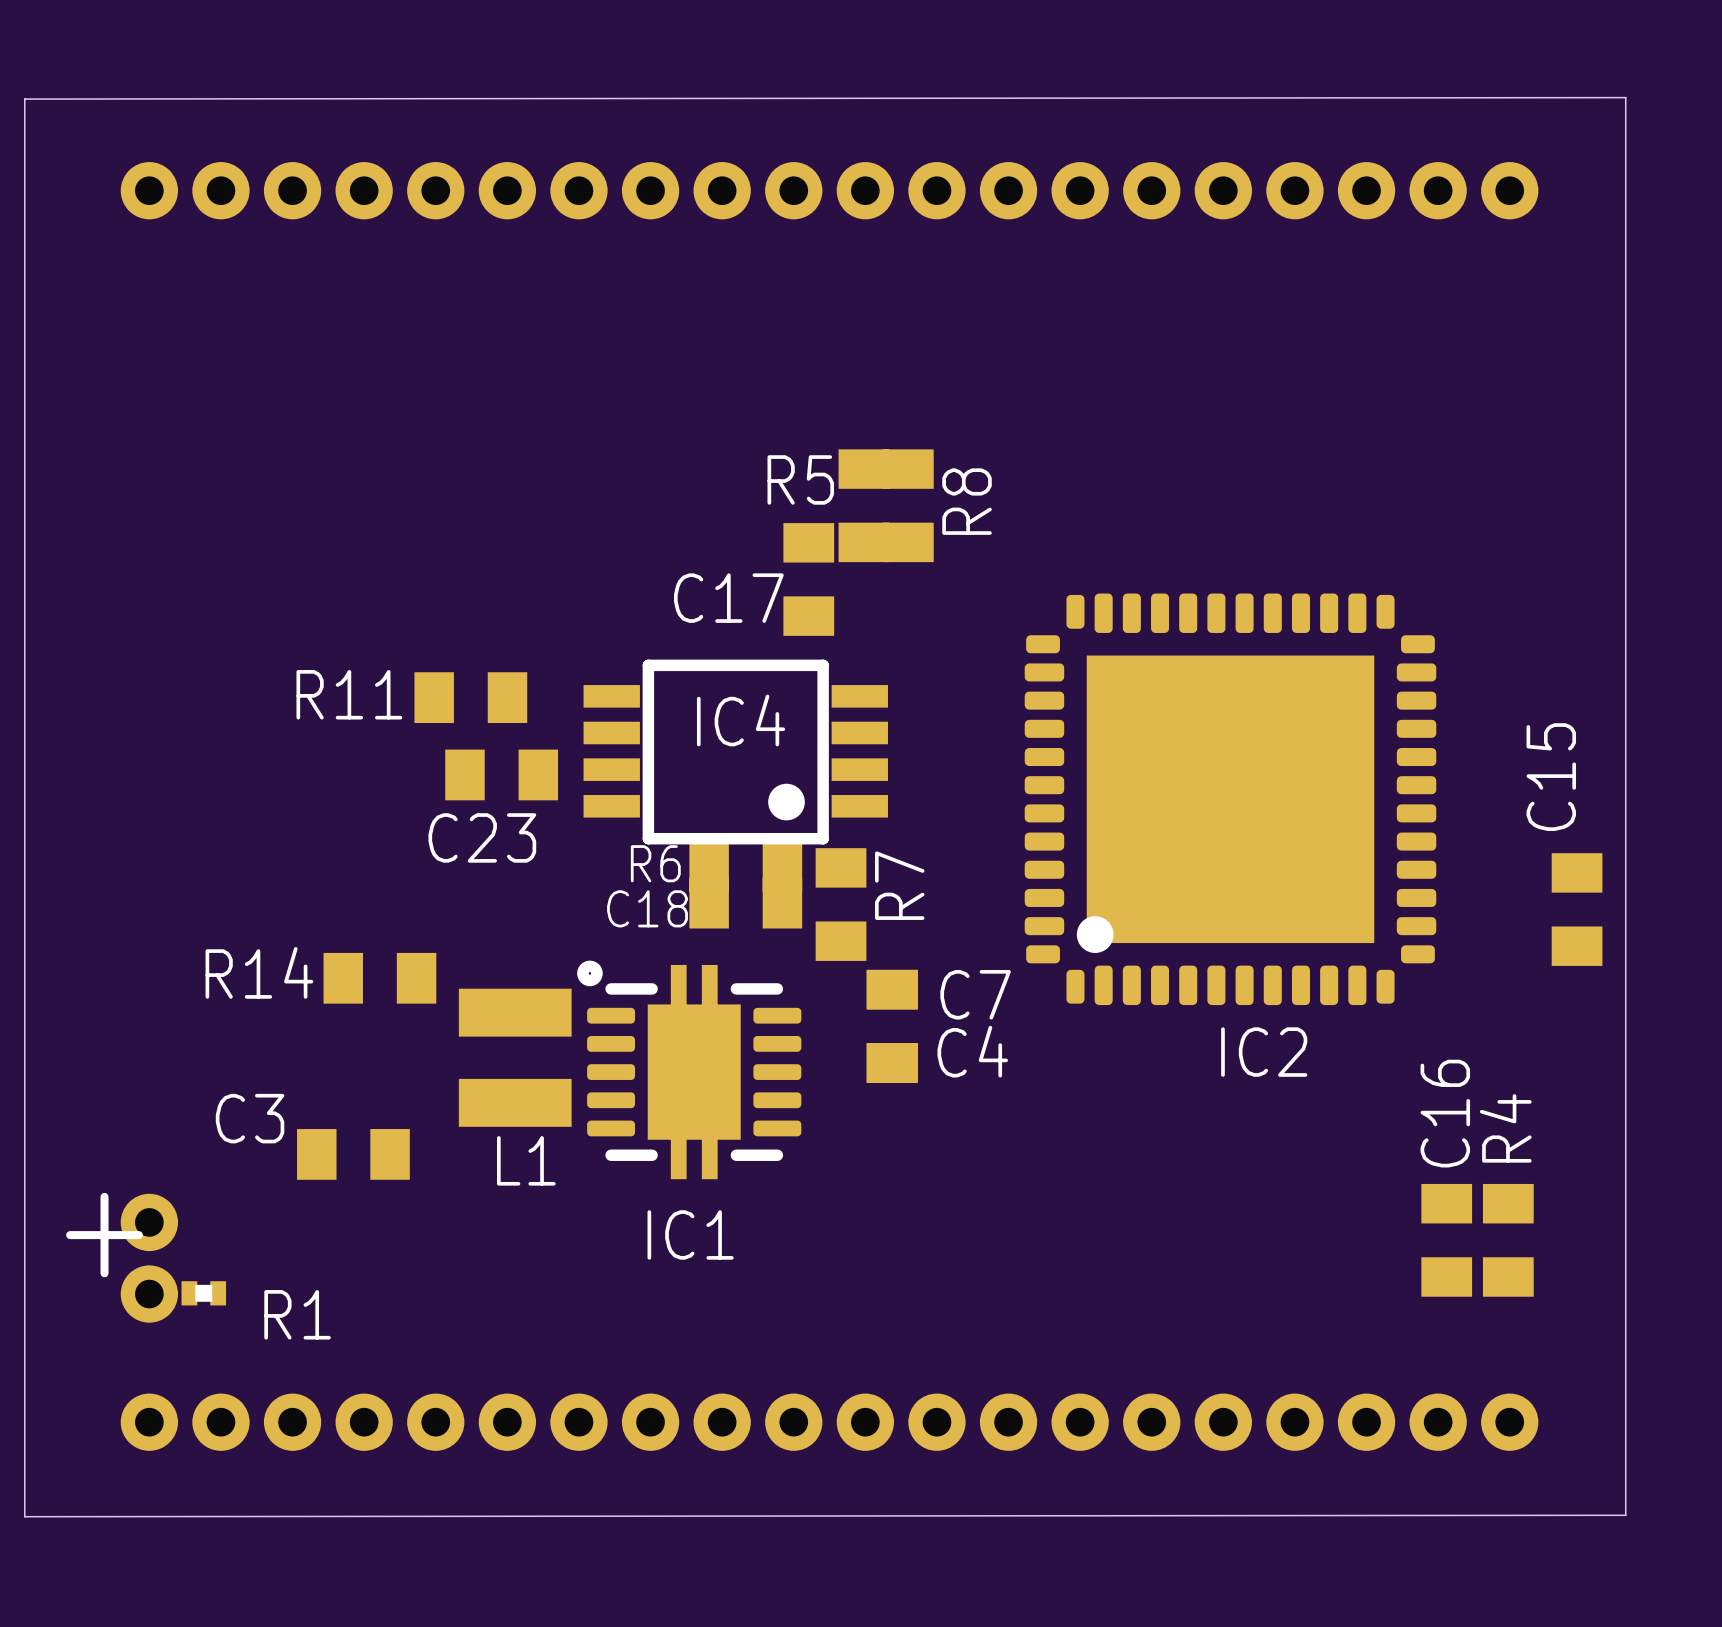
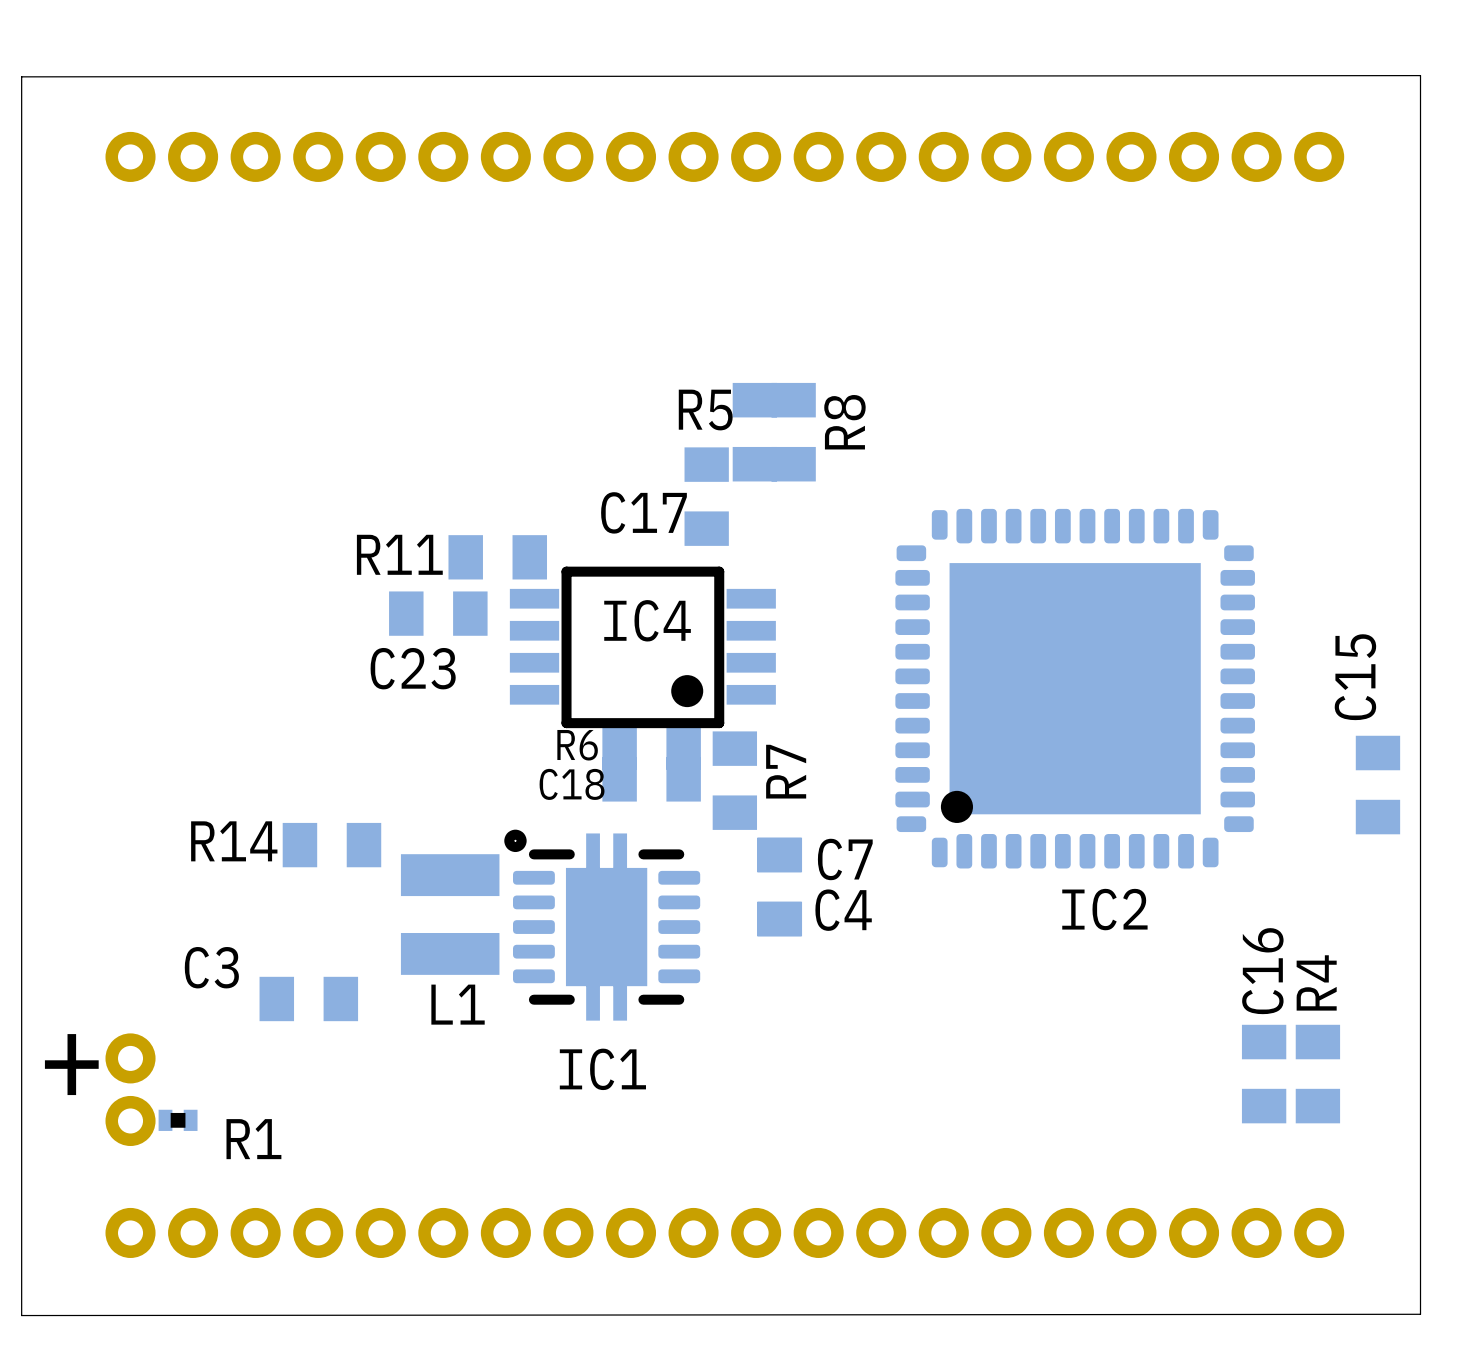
R11 position: (470, 697) -> (497, 557)
C23 position: (501, 774) -> (438, 613)

